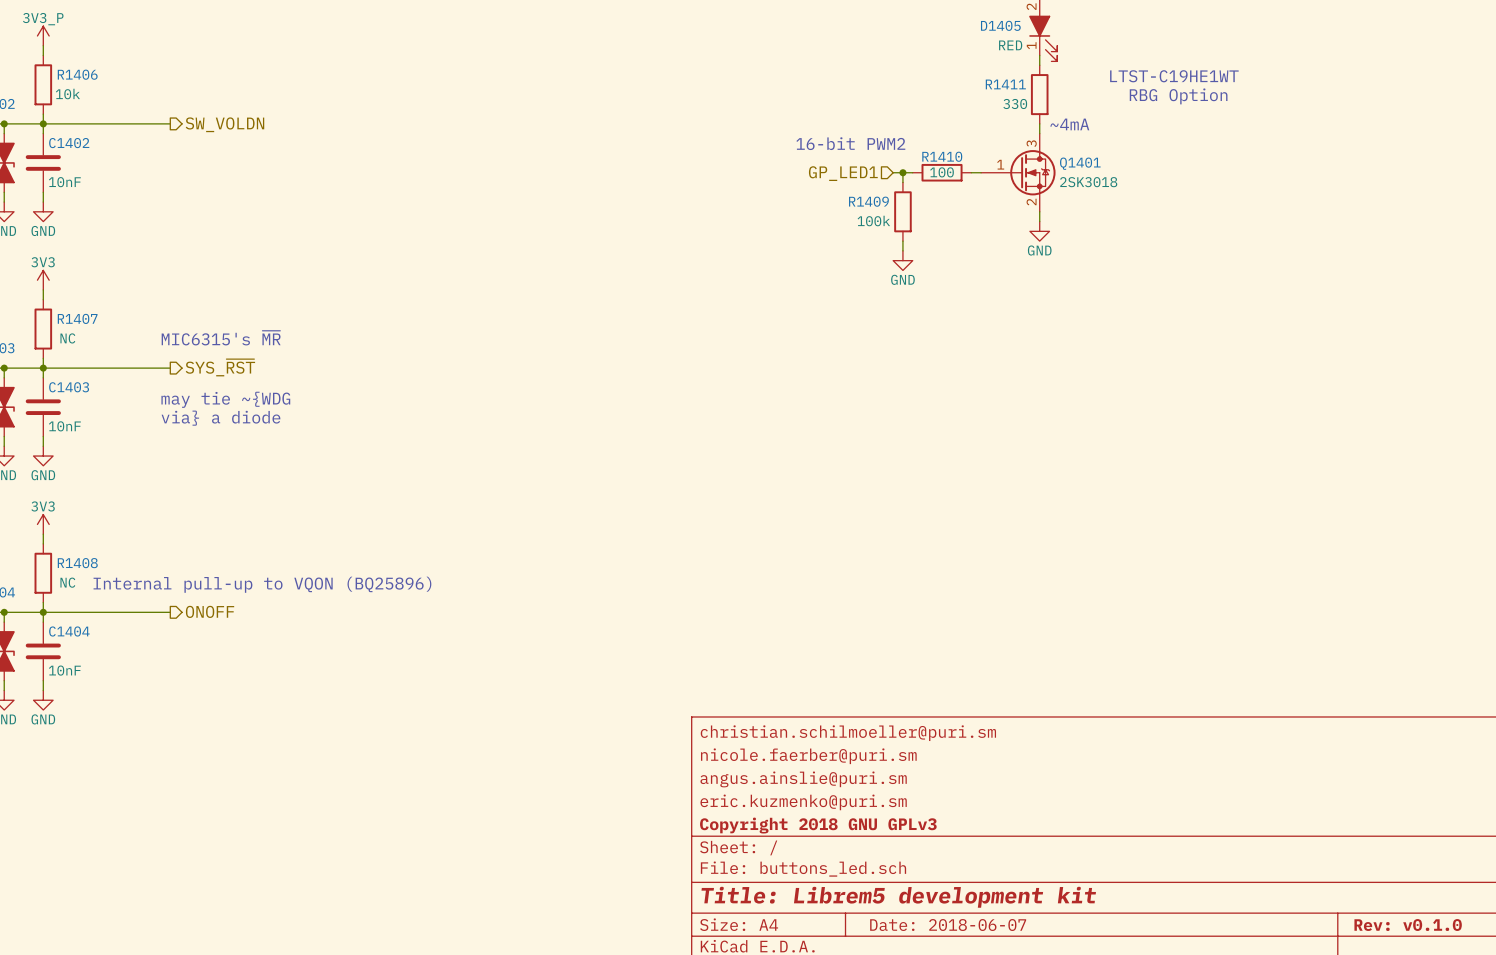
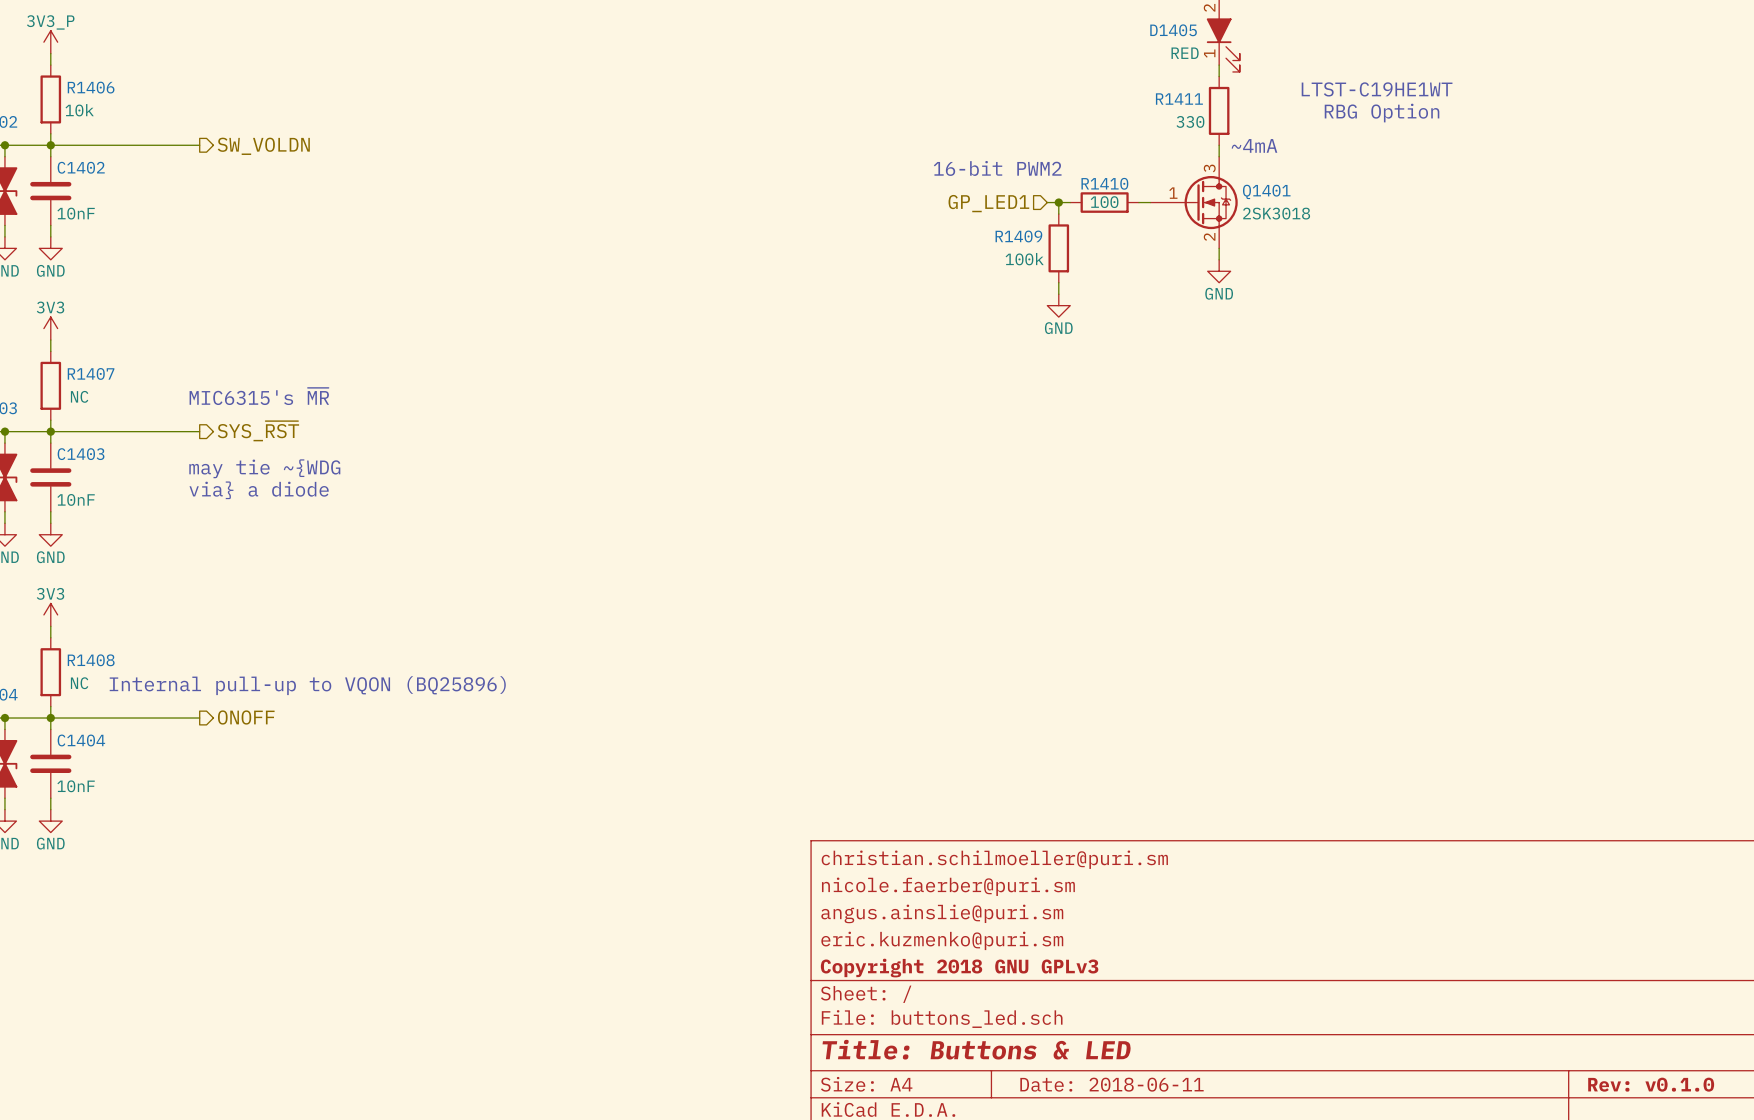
title block: Title: Librem5 development kit (898, 897) -> Title: Buttons & LED (976, 1049)
title block: Date: 2018-06-07 (948, 925) -> Date: 2018-06-11 (1112, 1084)

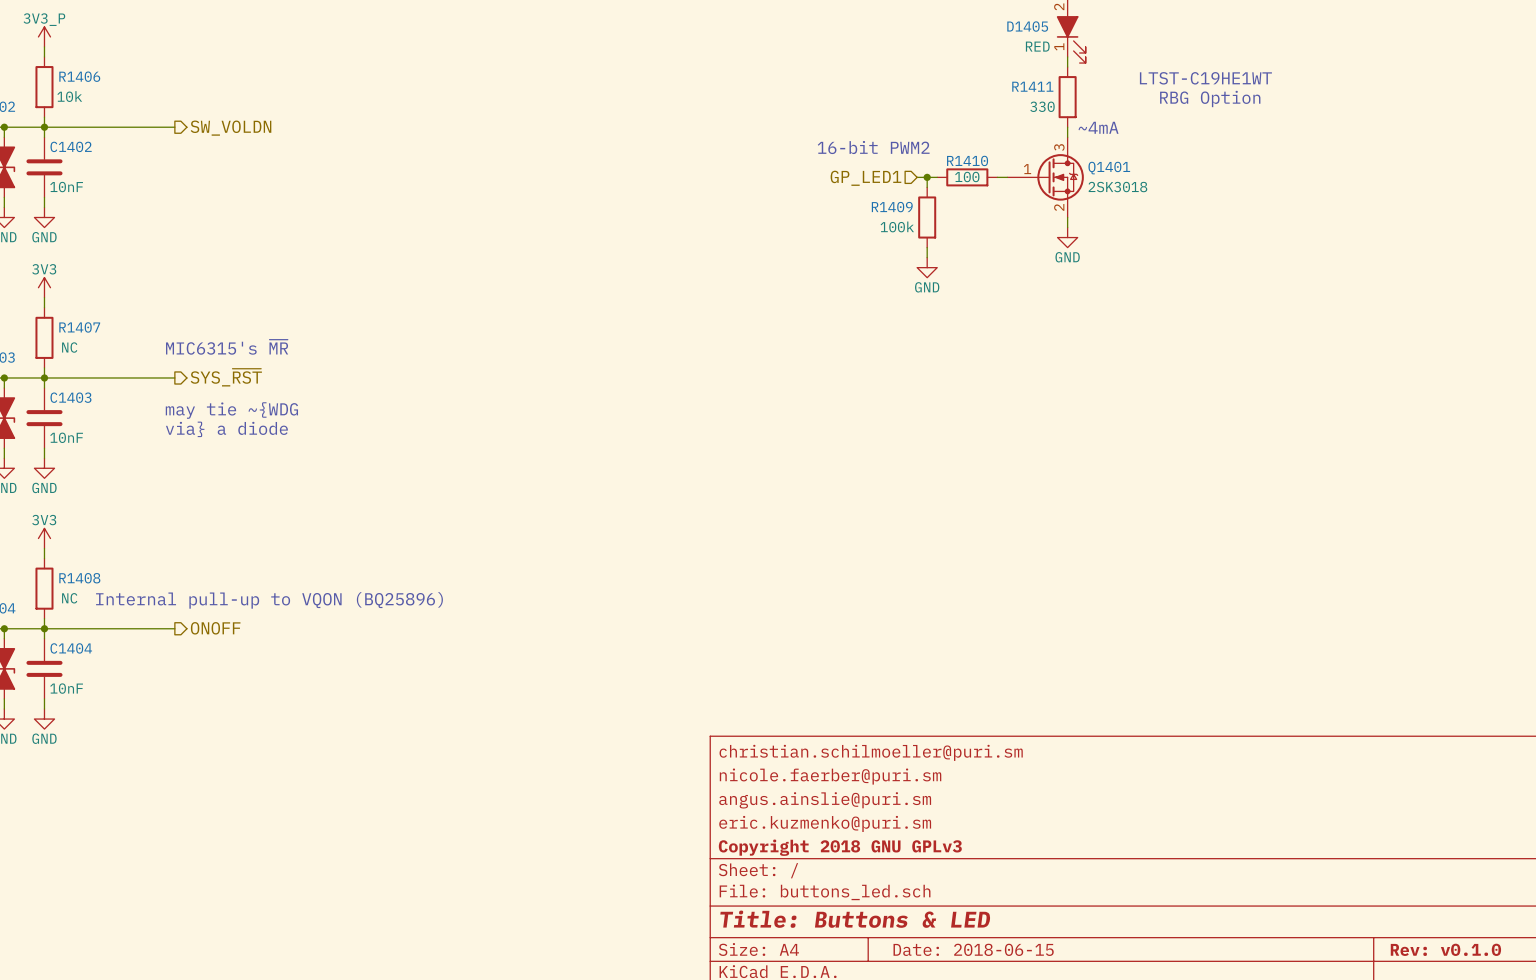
title block: Date: 2018-06-11 (1112, 1084) -> Date: 2018-06-15 (973, 949)

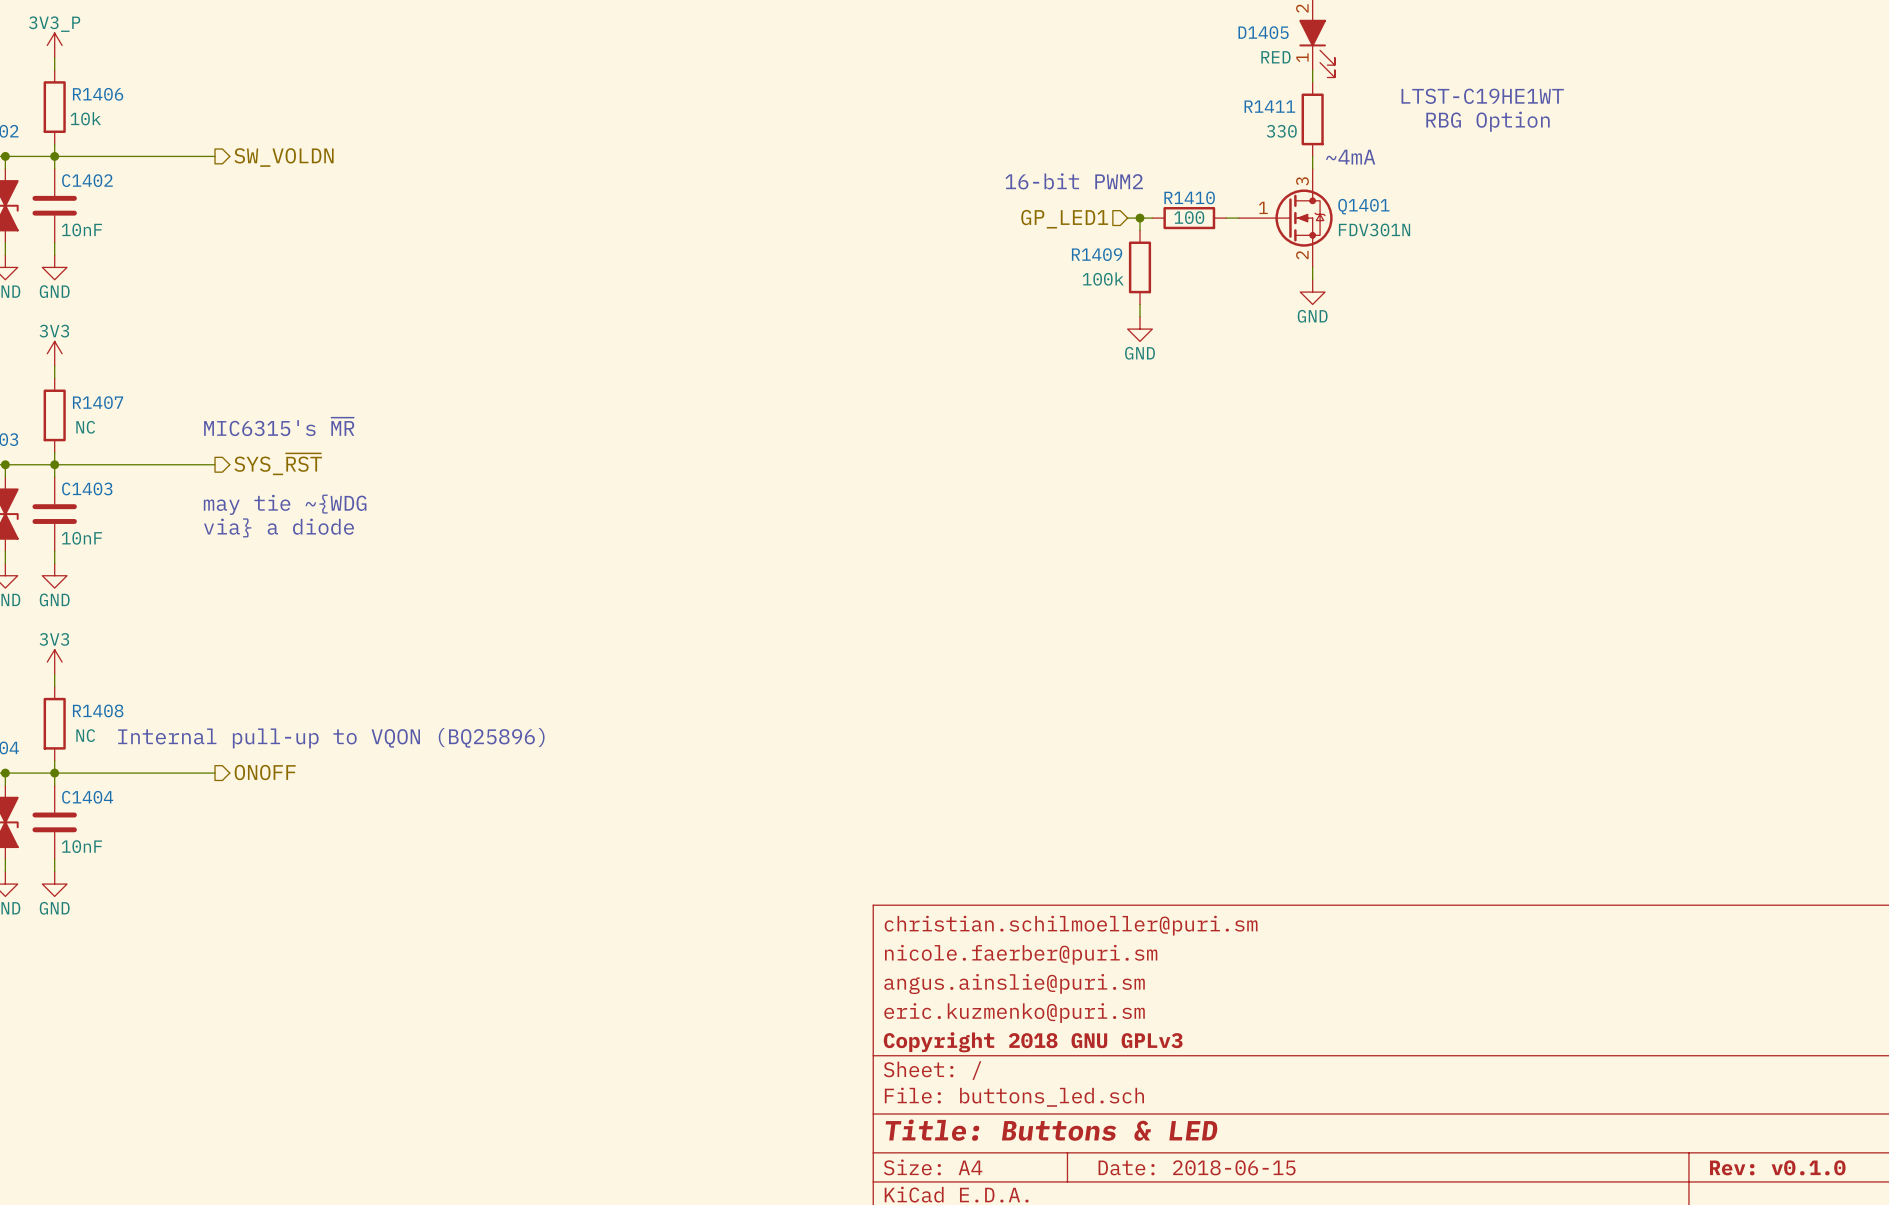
Q1401 value: 2SK3018 (1117, 187) -> FDV301N (1374, 229)

